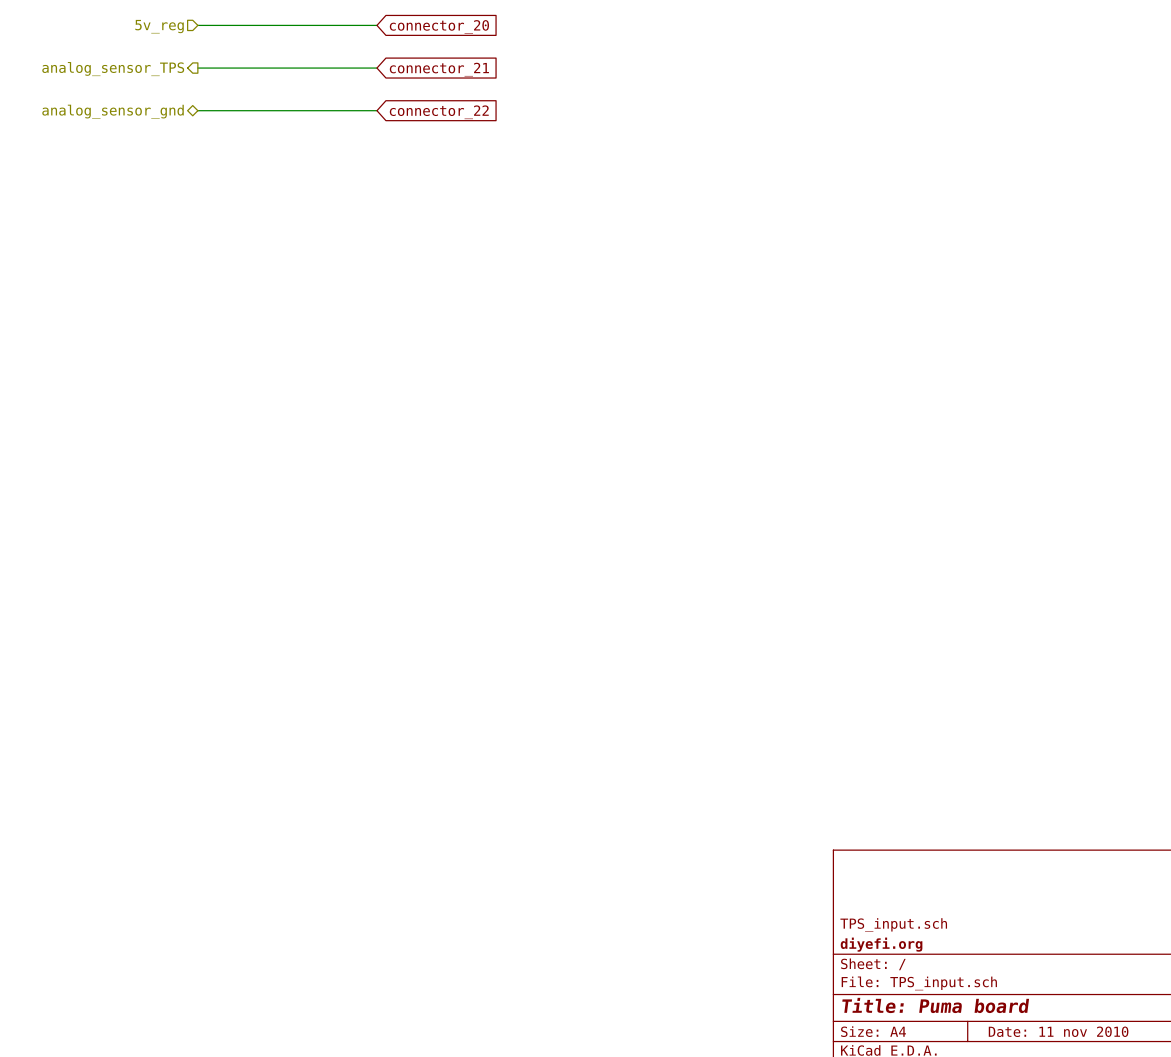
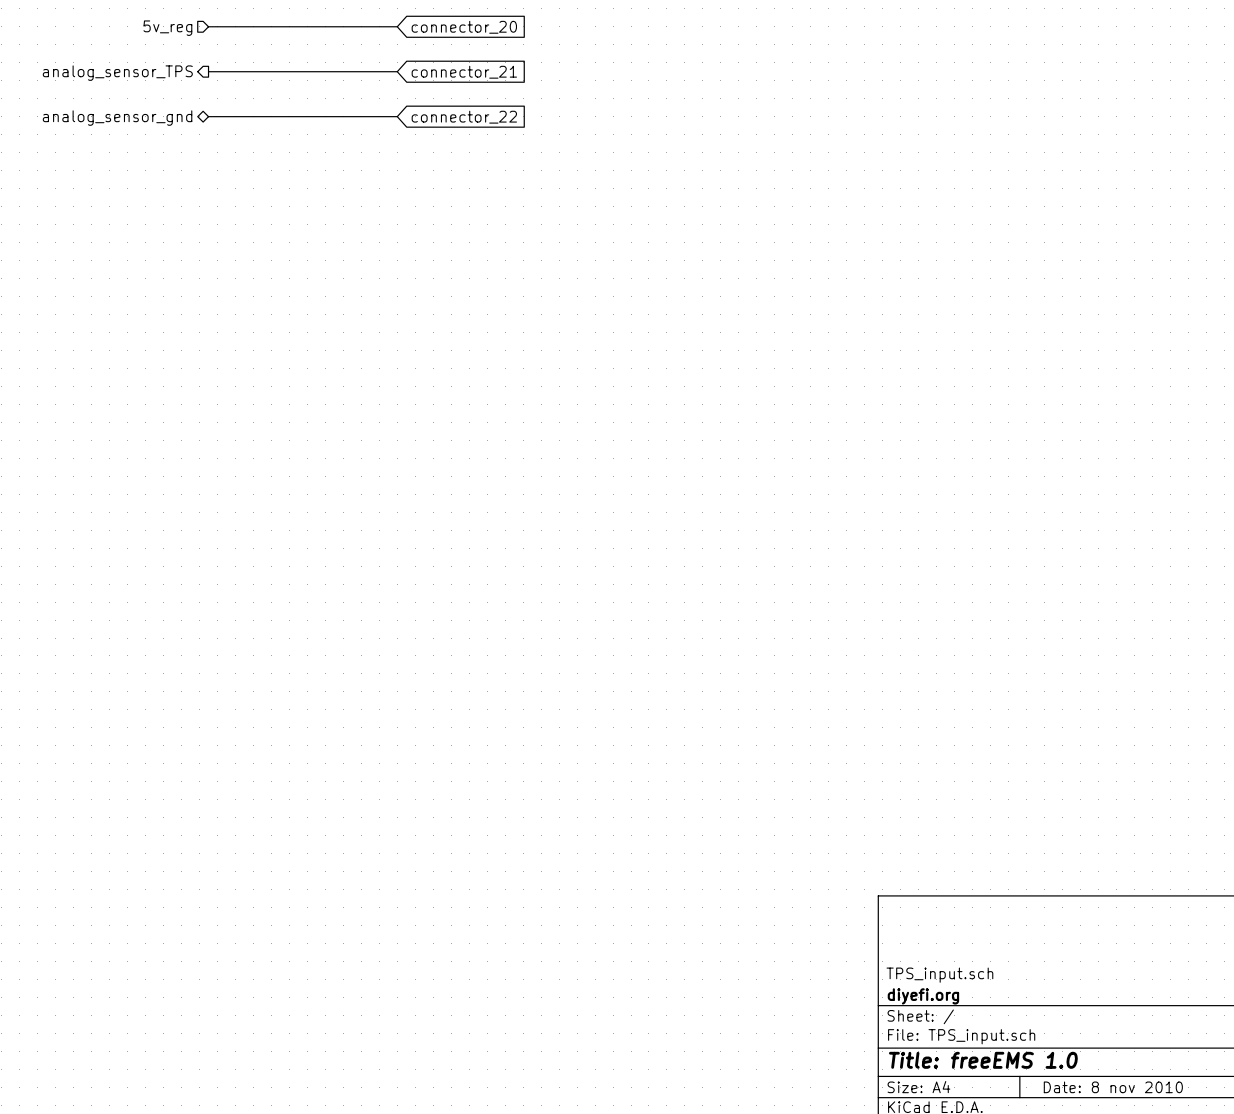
title block: Title: Puma board (935, 1005) -> Title: freeEMS 1.0 (983, 1060)
title block: Date: 11 nov 2010 (1058, 1031) -> Date: 8 nov 2010 (1113, 1087)

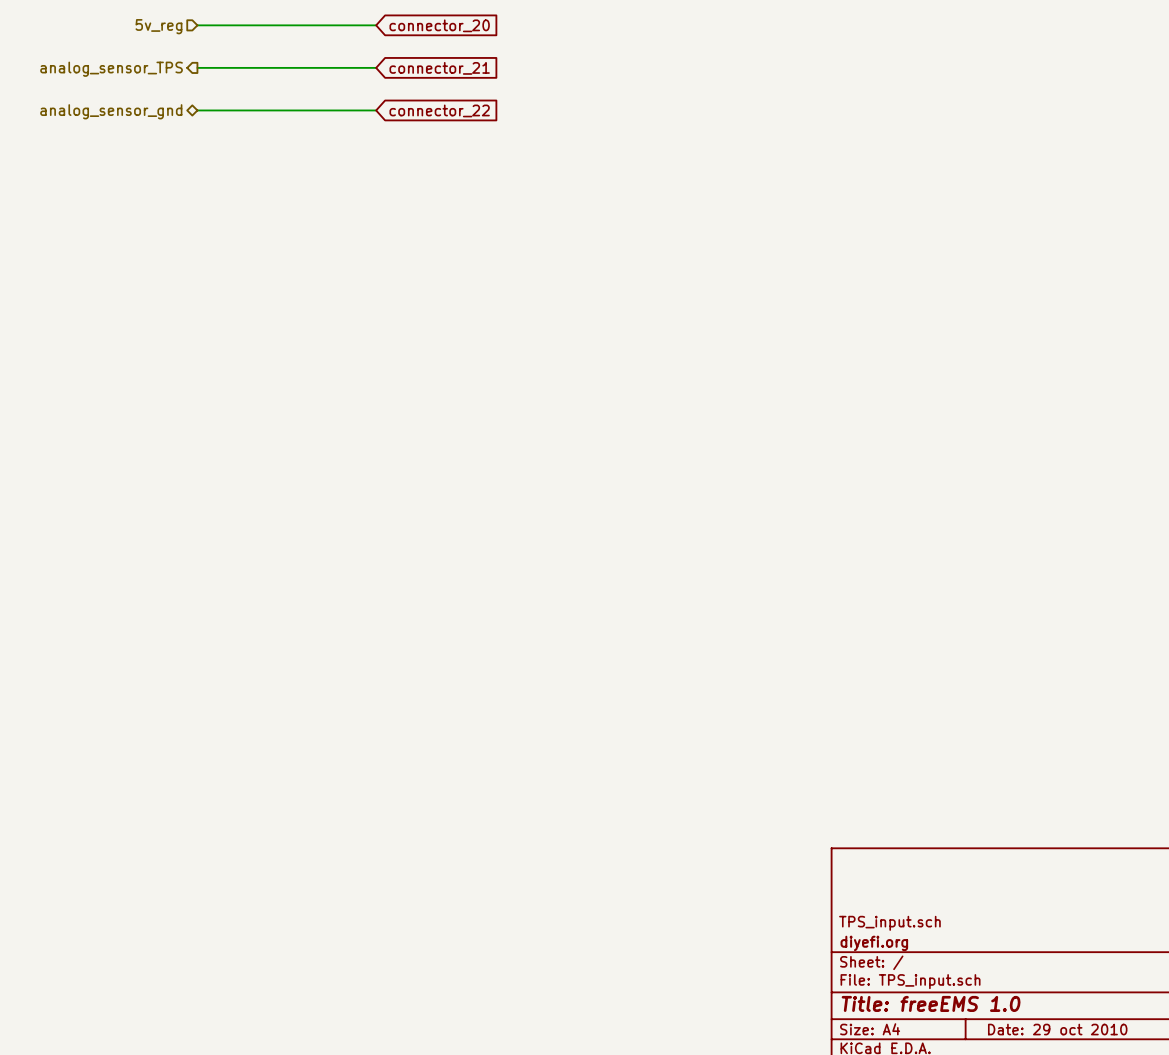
title block: Date: 8 nov 2010 (1113, 1087) -> Date: 29 oct 2010 (1057, 1029)

